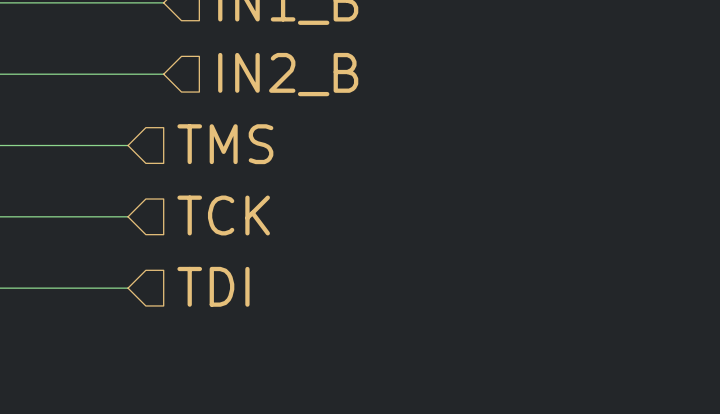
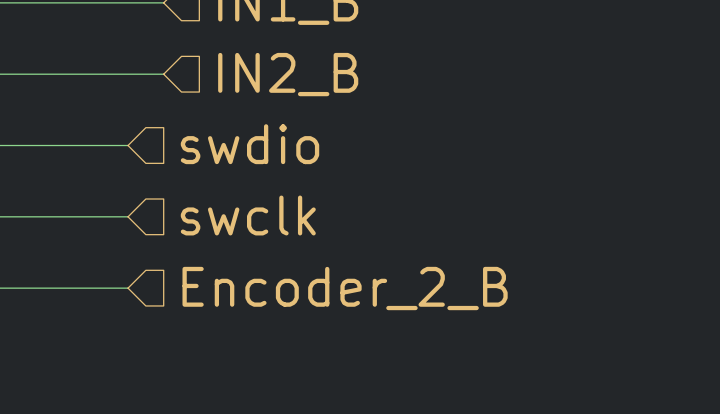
hierarchical label: TMS (225, 144) -> swdio (249, 144)
hierarchical label: TCK (223, 215) -> swclk (248, 215)
hierarchical label: TDI (213, 286) -> Encoder_2_B (345, 288)

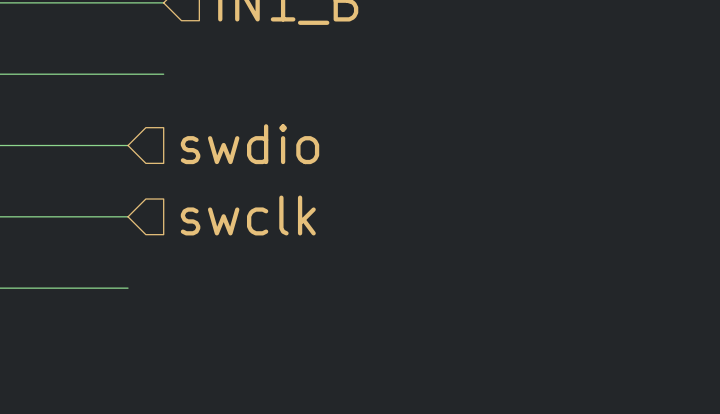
hierarchical label: IN2_B (288, 74) -> none
hierarchical label: Encoder_2_B (345, 288) -> none

